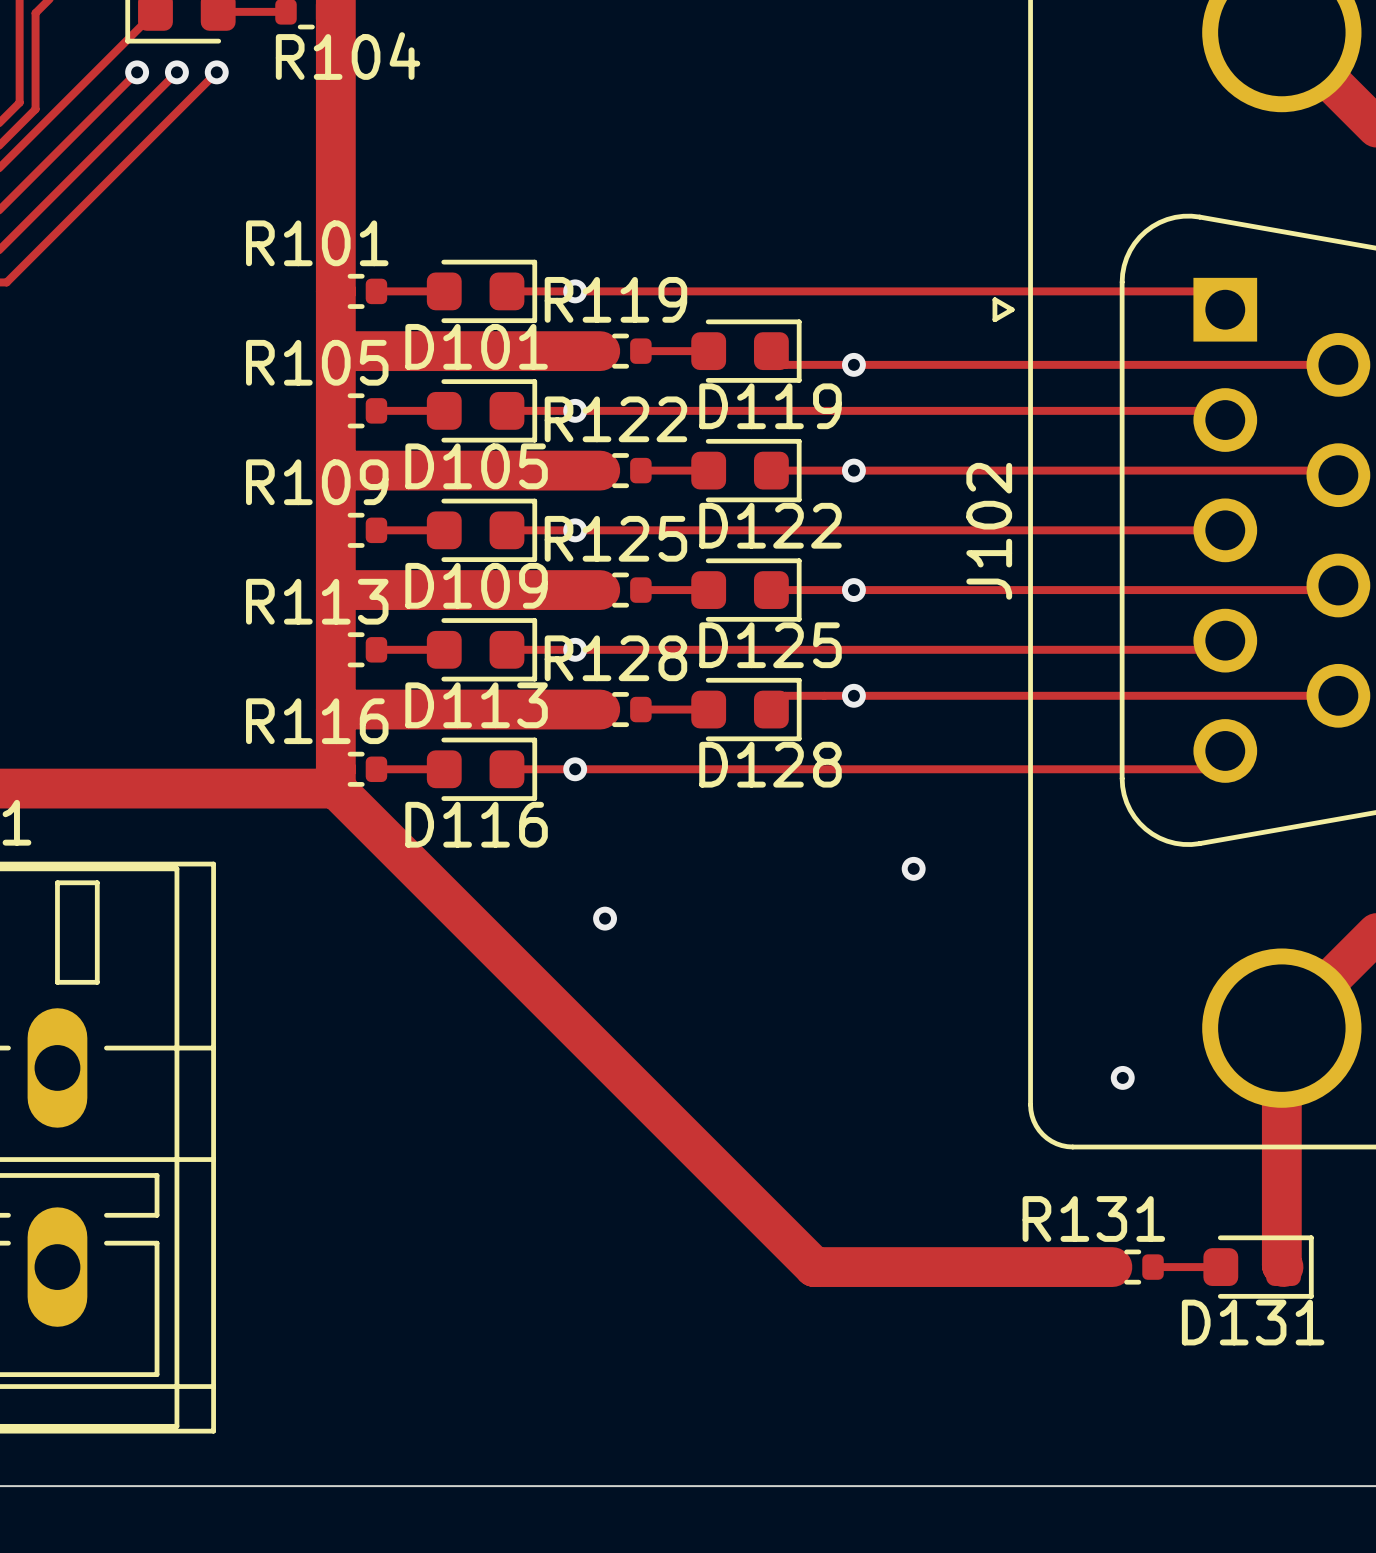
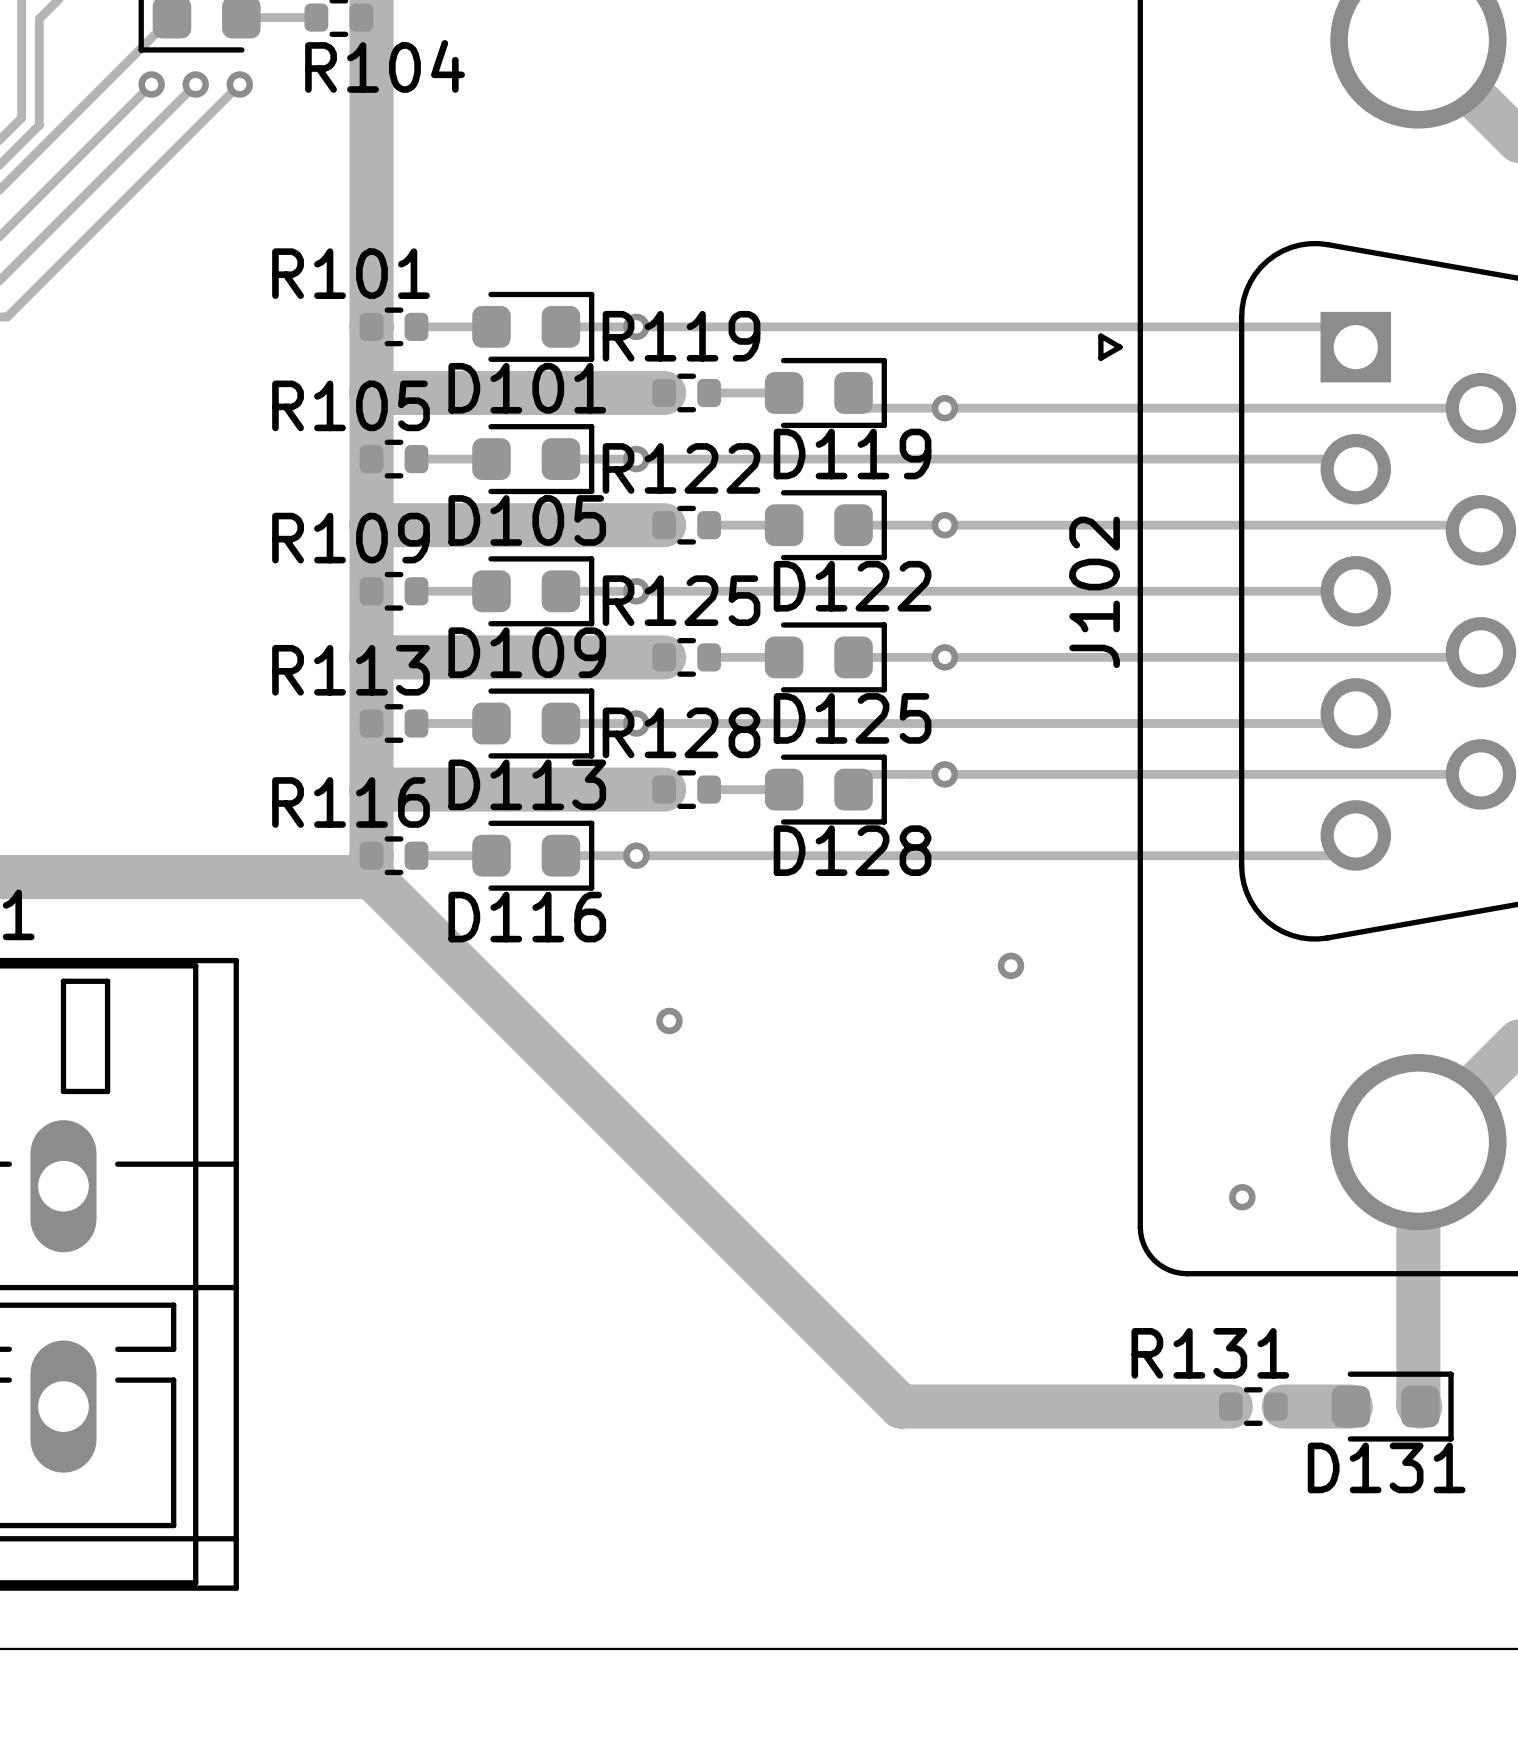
track width: thin (1160, 1267) (1220, 1267) -> thick (1283, 1406) (1350, 1406)

